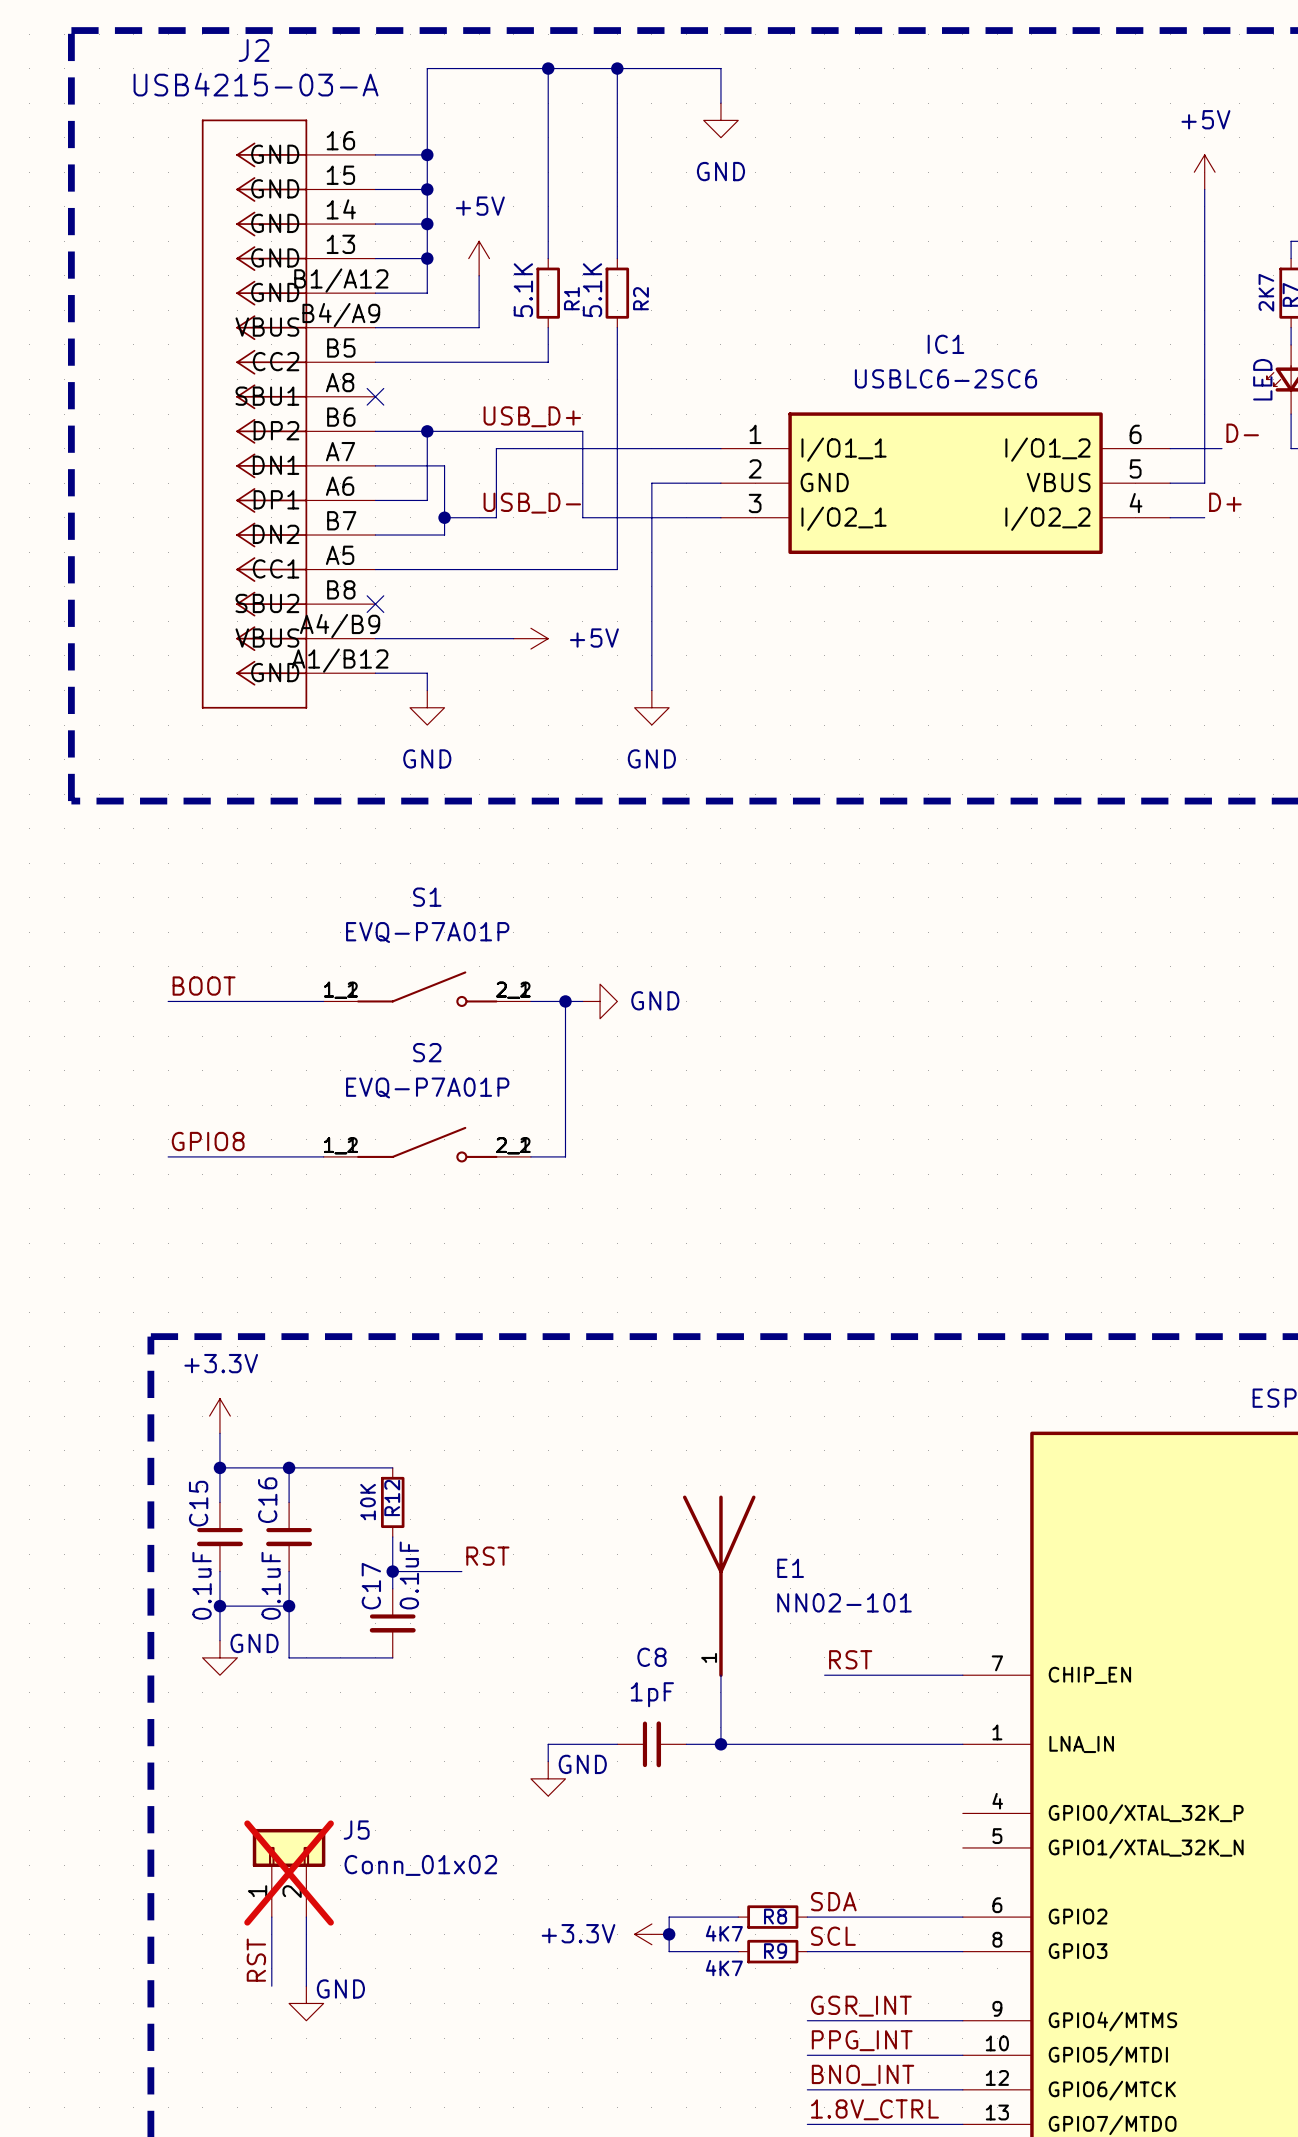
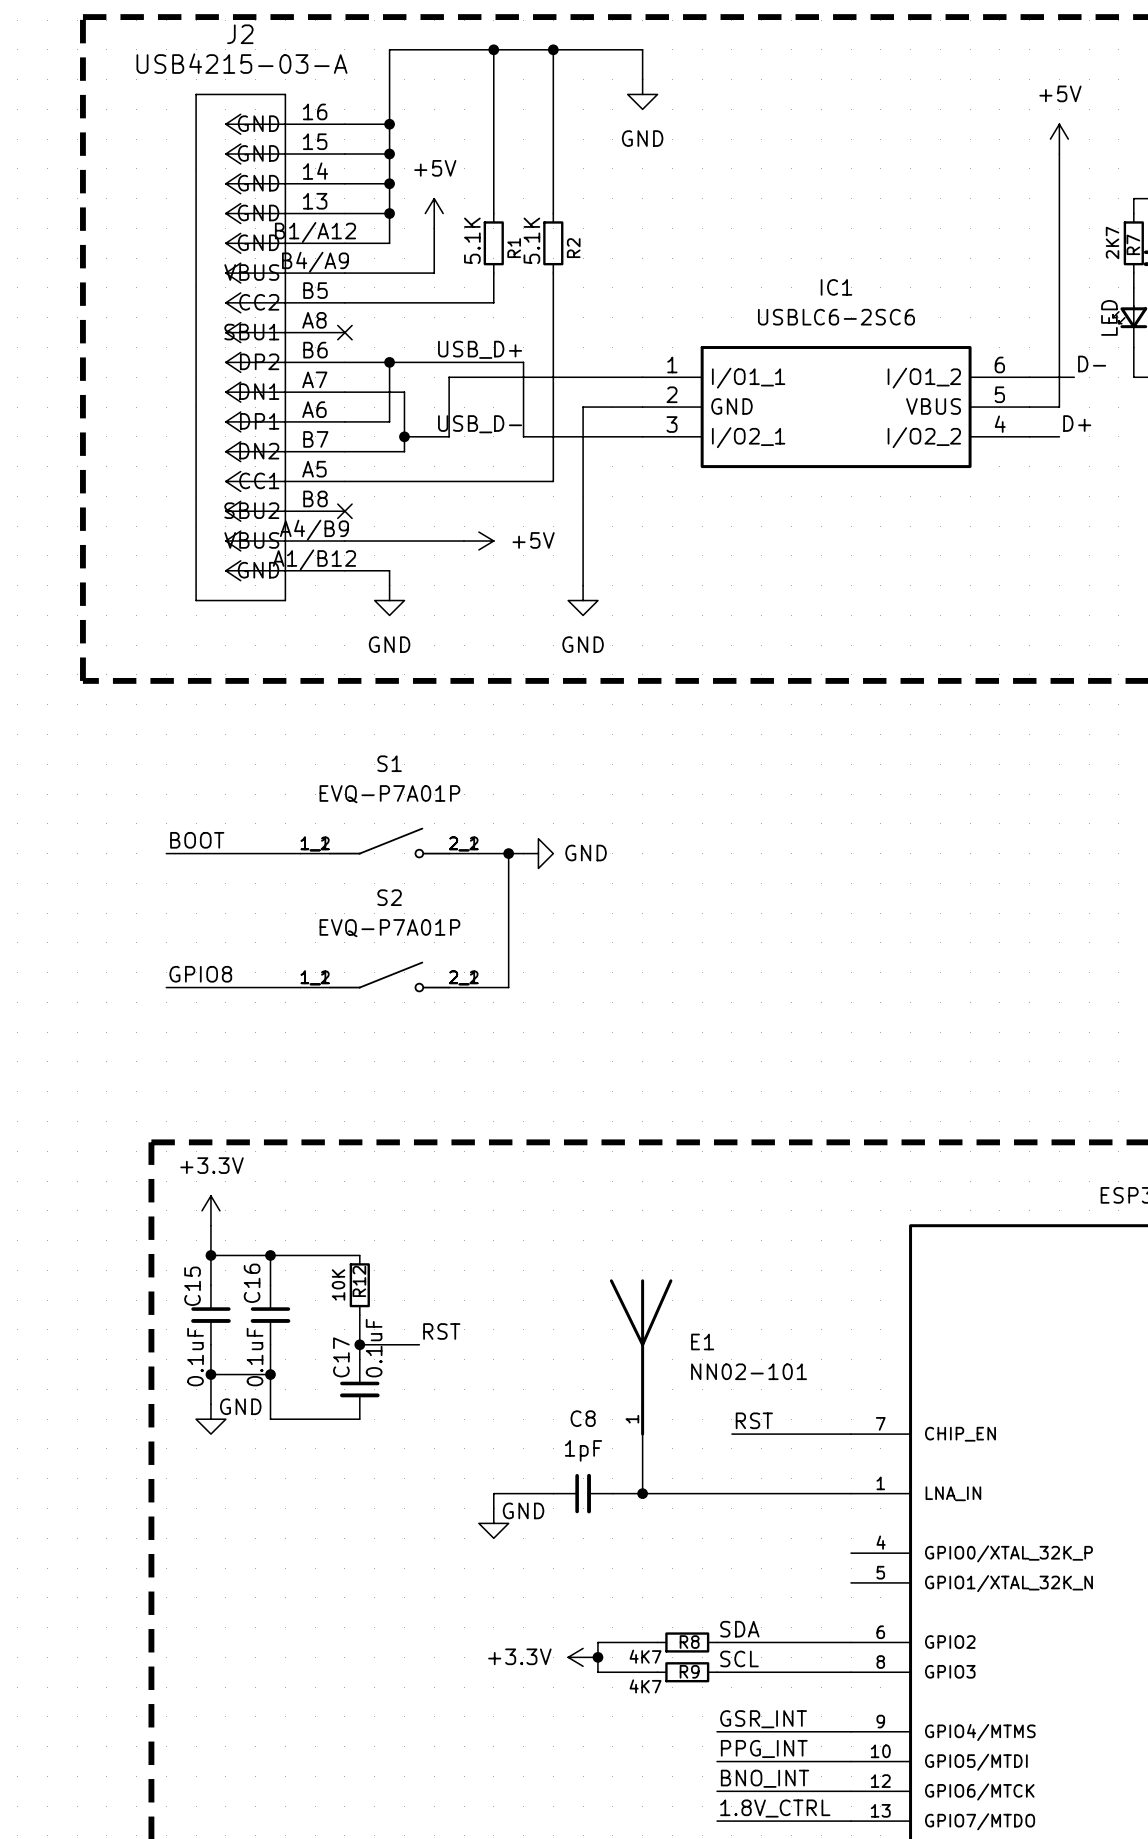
J5: Conn_01x02 (289, 1873) -> none
wire: (271, 1917) (271, 1986) -> none
wire: (306, 1917) (306, 1986) -> none
label: RST (256, 1960) -> none
power symbol: GND (306, 2003) -> none

